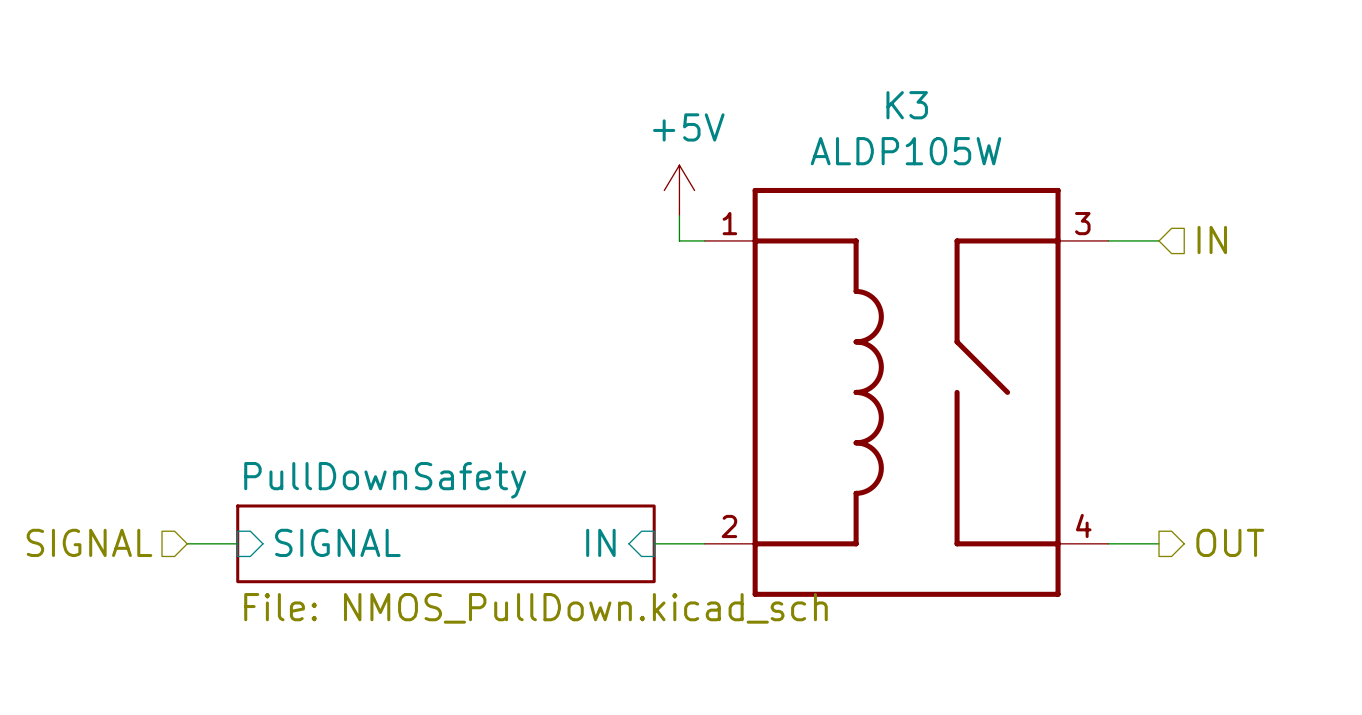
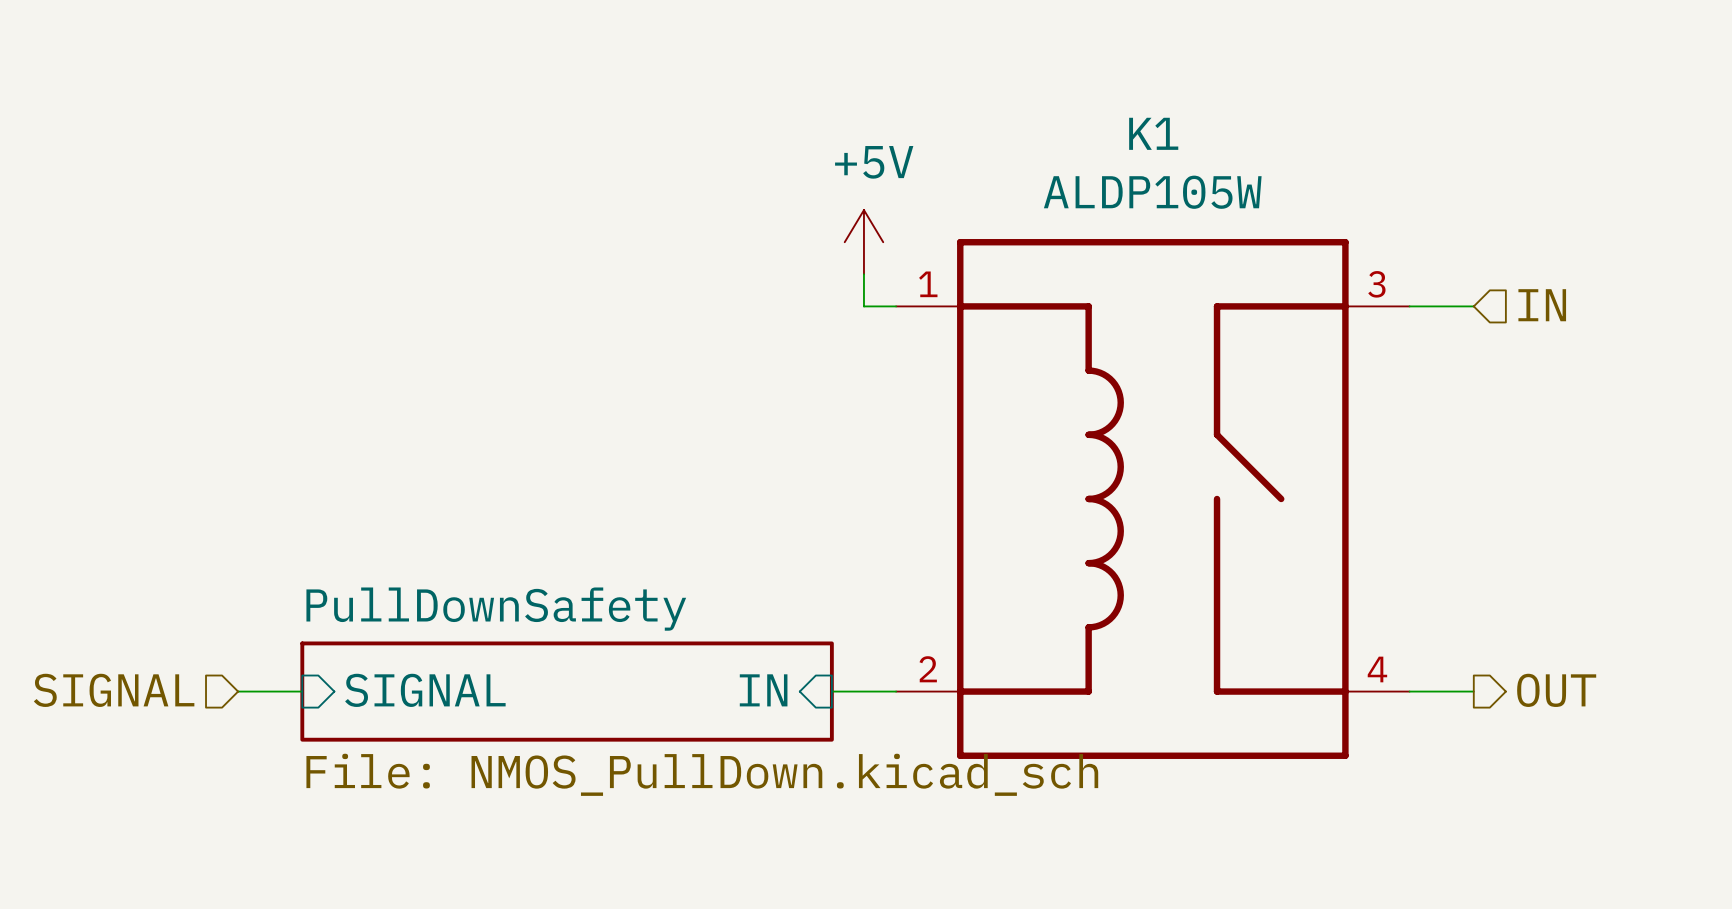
K3 name: K3 (907, 105) -> K1 (1153, 133)

